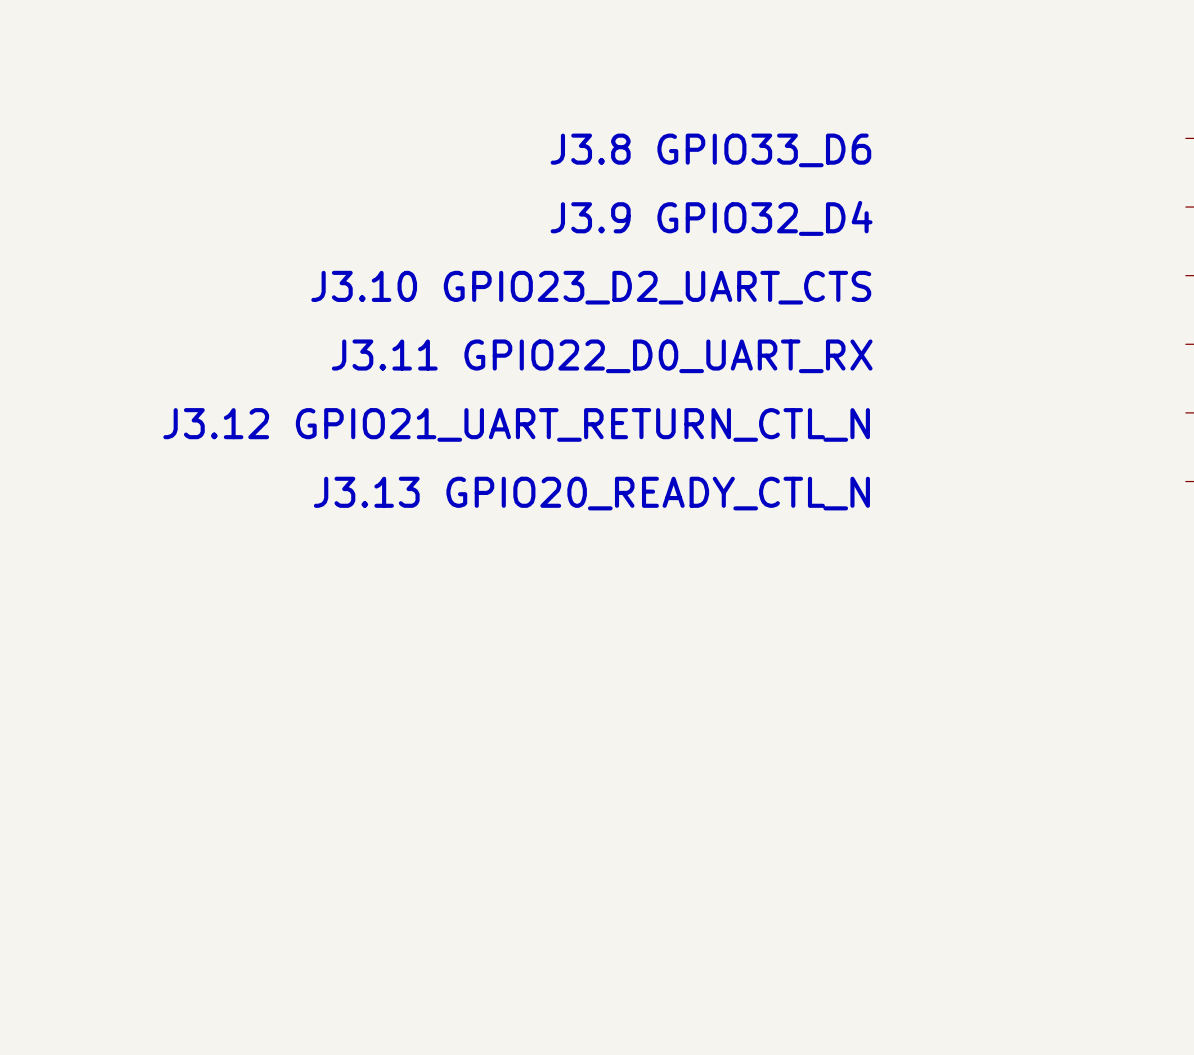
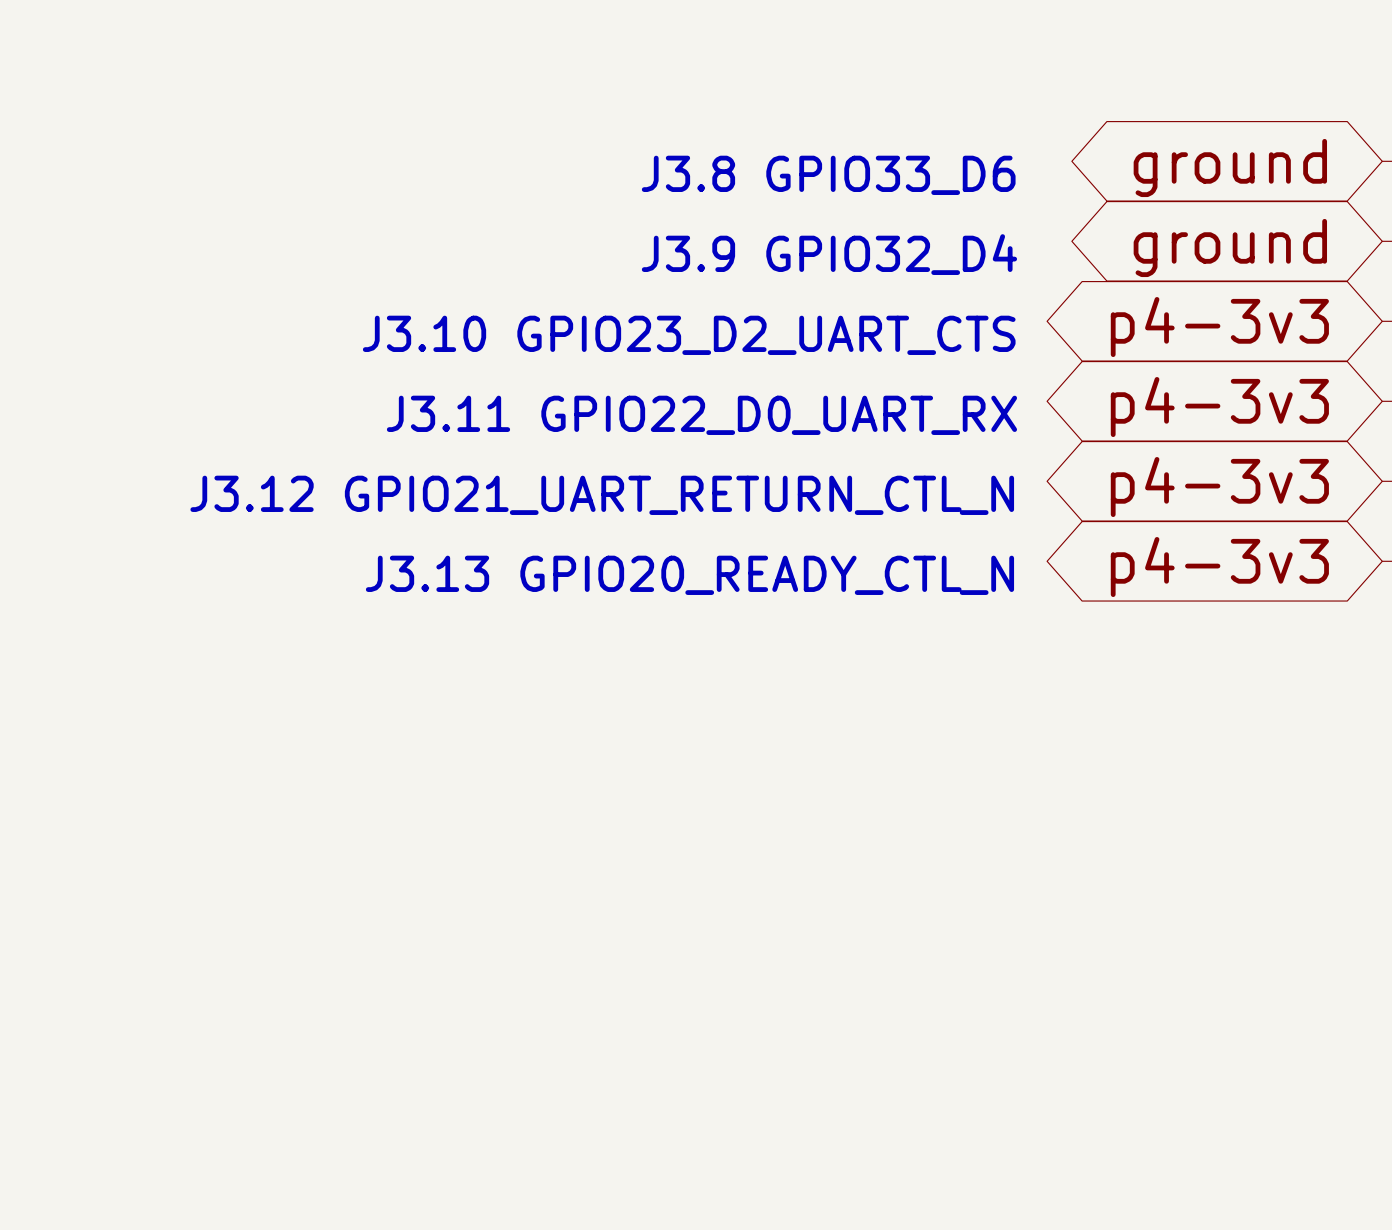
global label: none -> ground (1230, 167)
global label: none -> ground (1230, 247)
global label: none -> p4-3v3 (1219, 327)
global label: none -> p4-3v3 (1219, 407)
global label: none -> p4-3v3 (1219, 487)
global label: none -> p4-3v3 (1219, 567)

